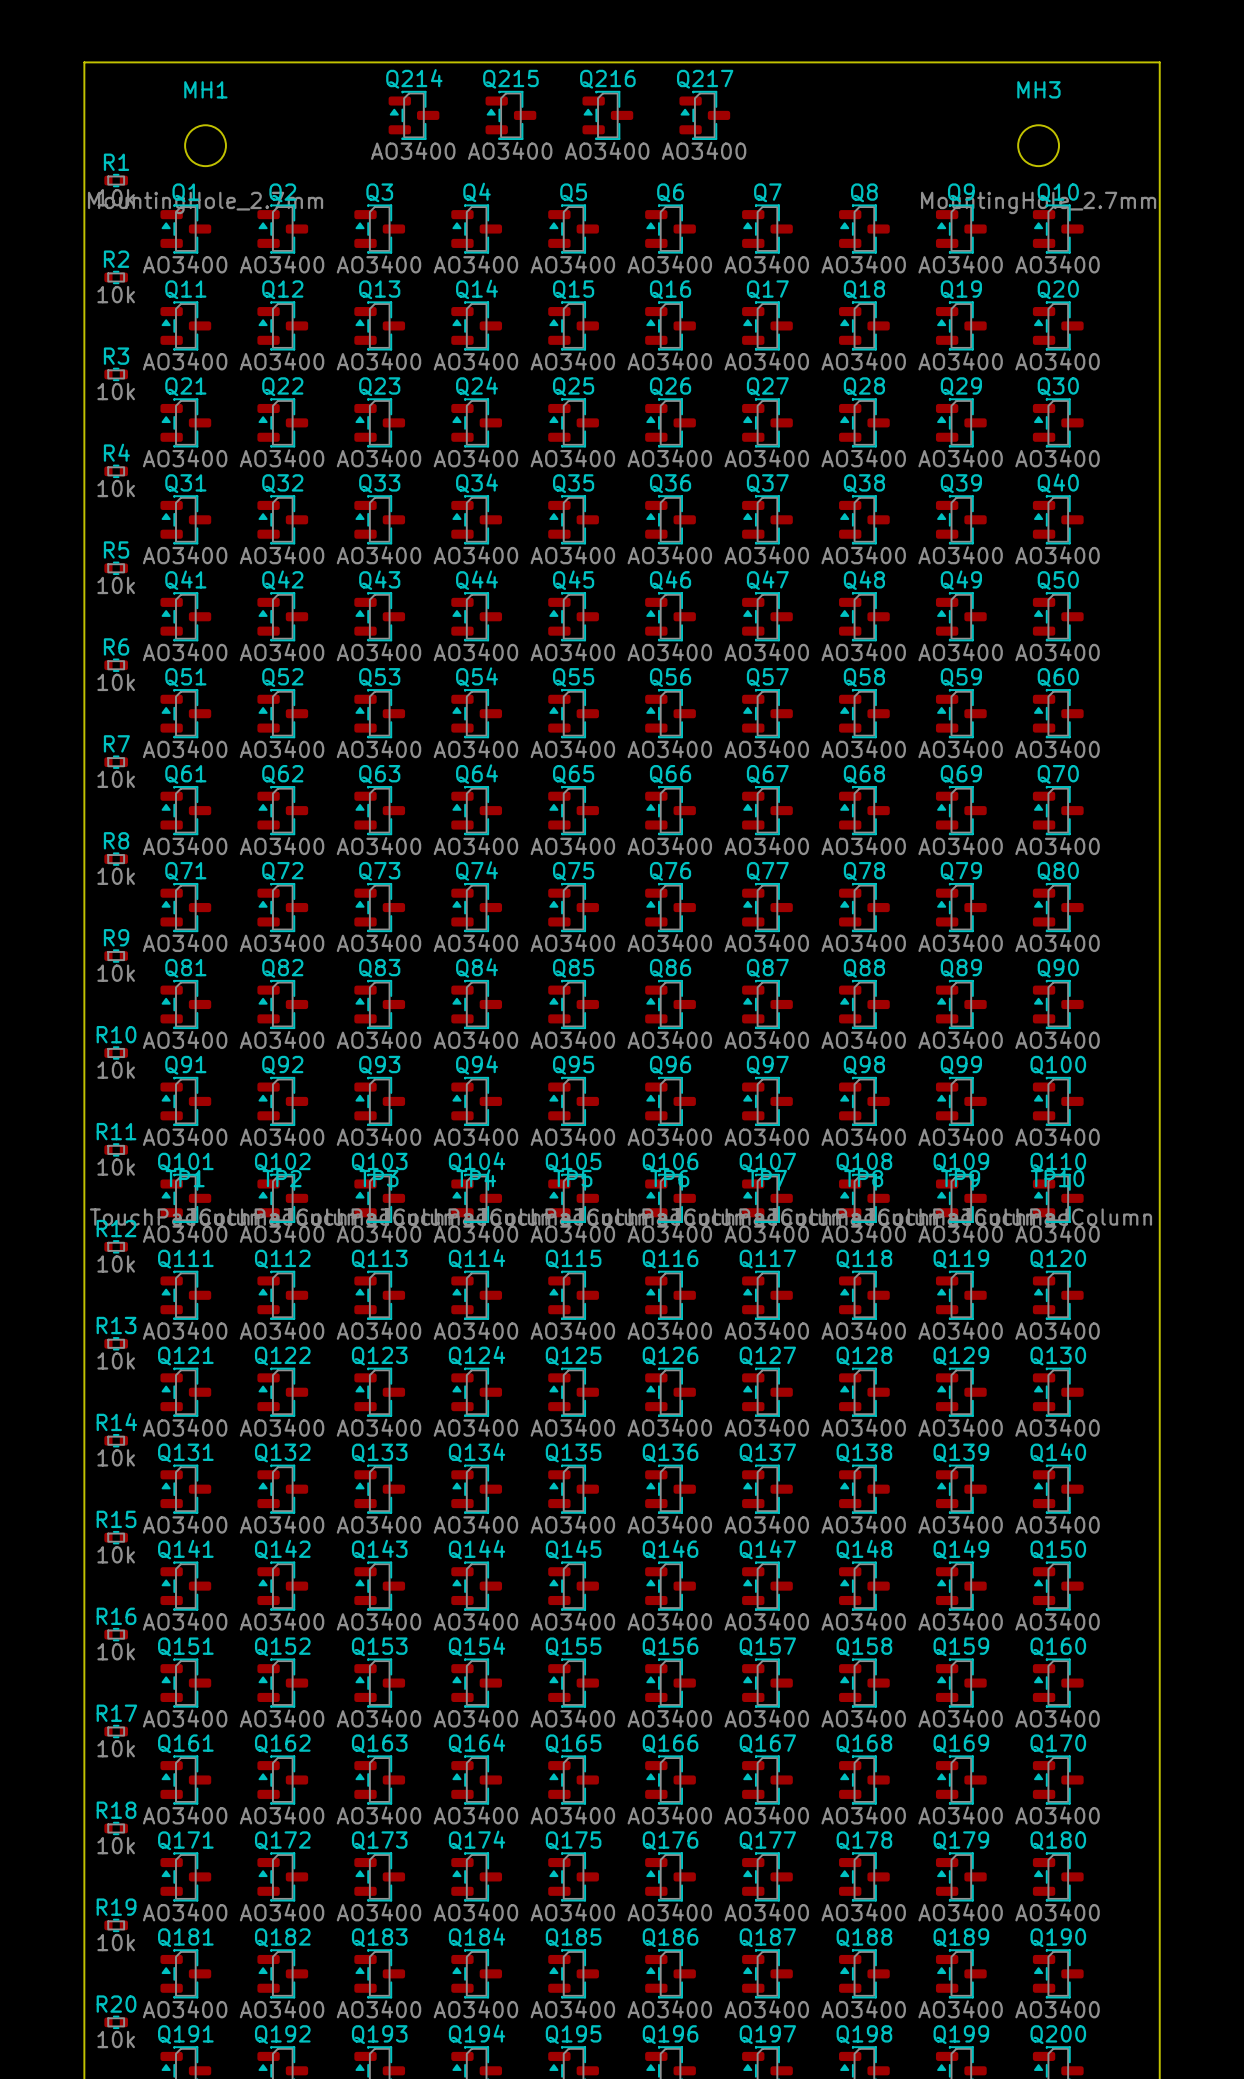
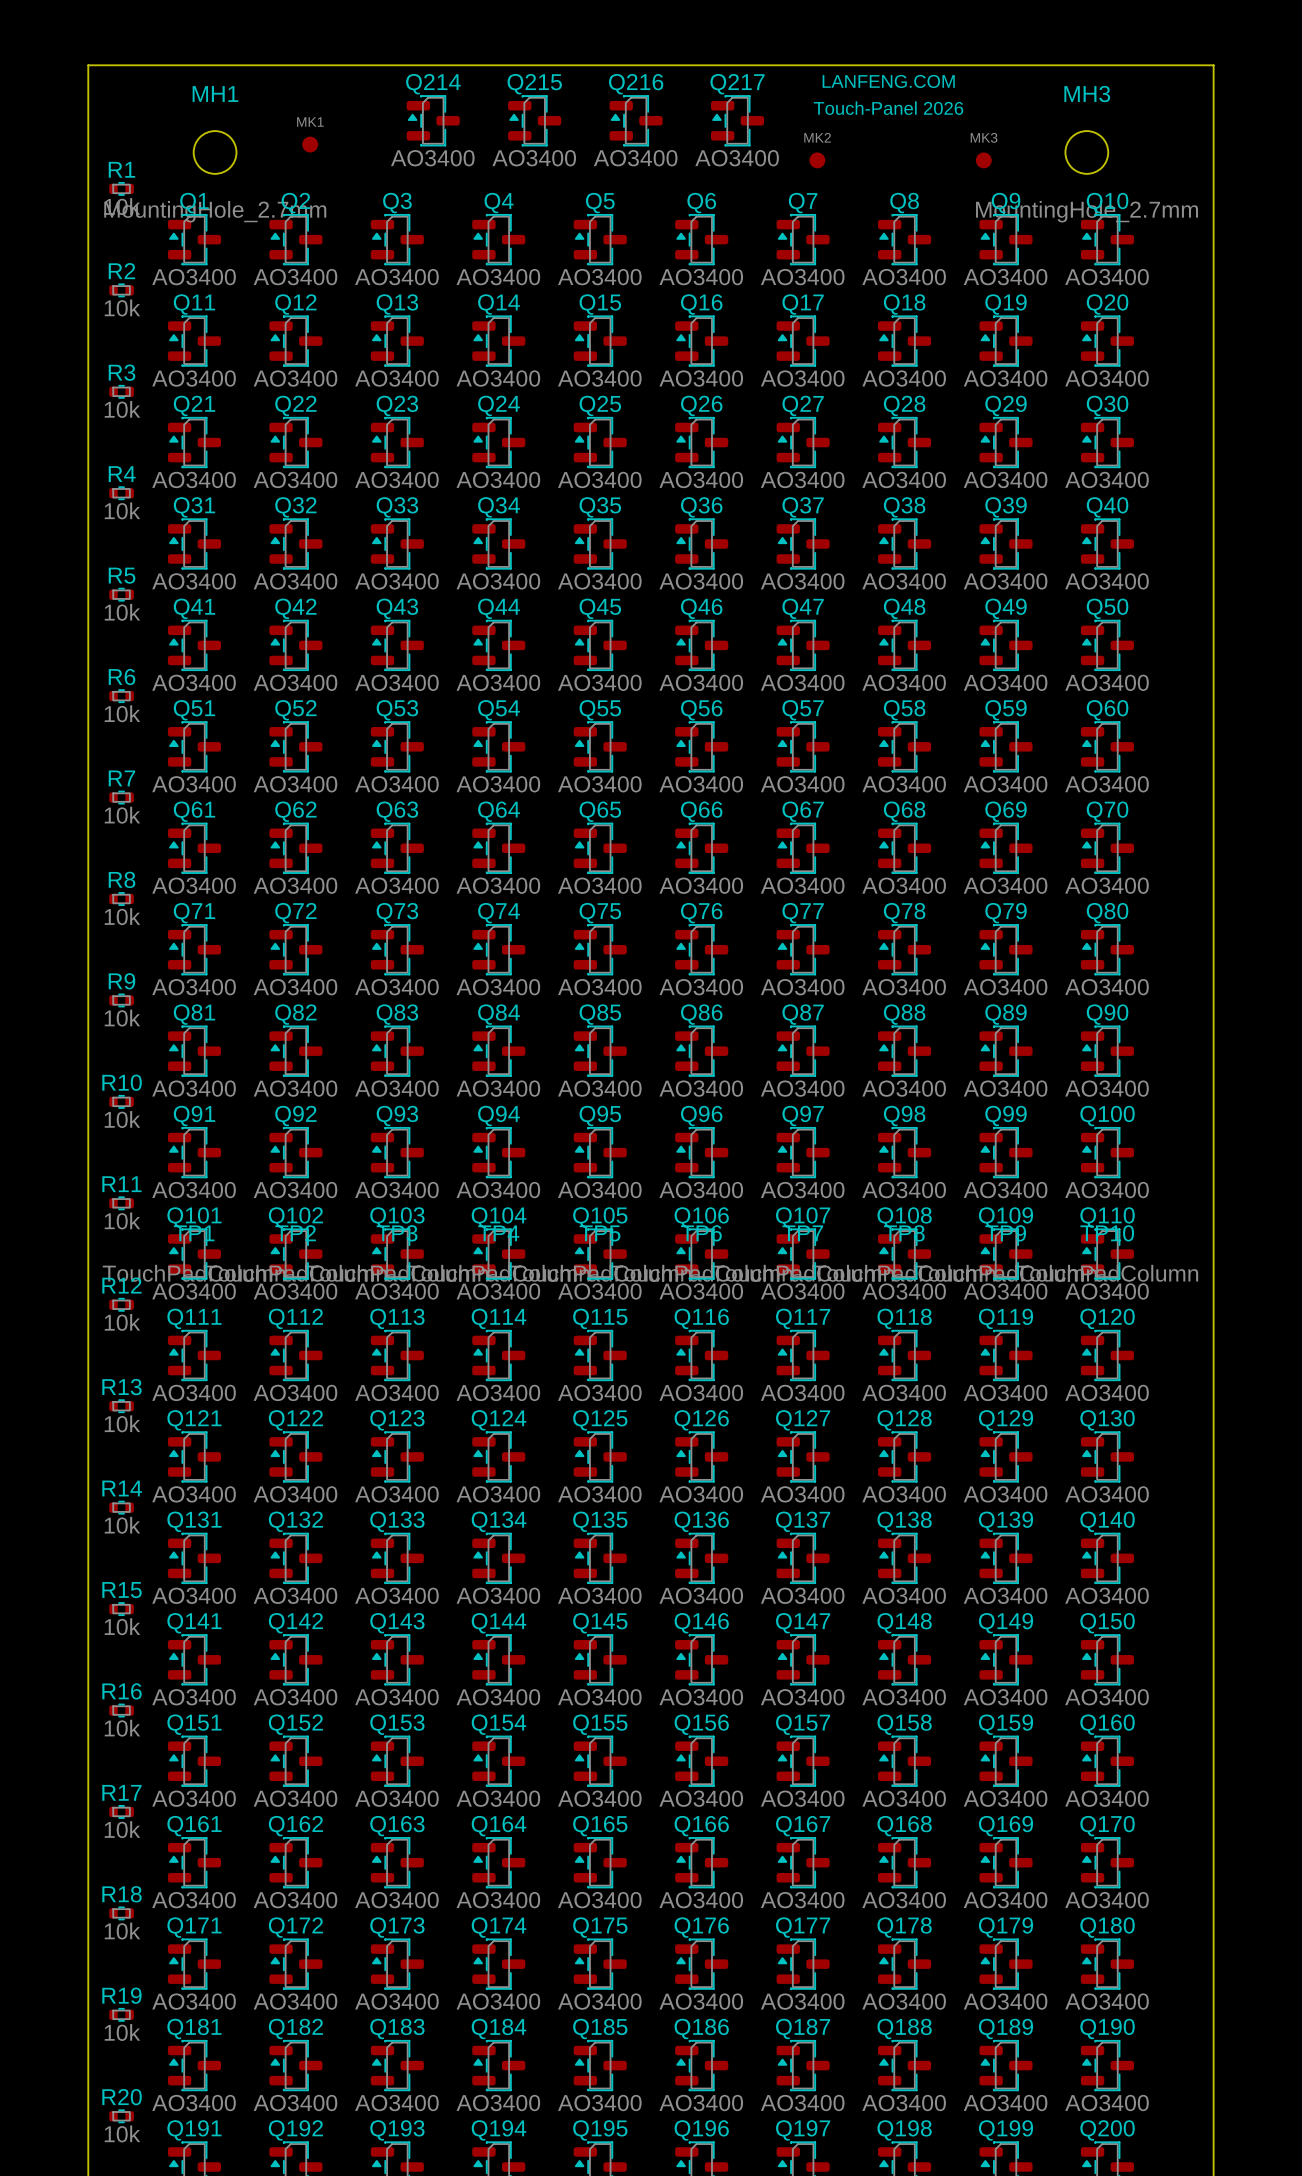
text: none -> LANFENG.COM (888, 81)
text: none -> Touch-Panel 2026 (888, 108)
MK1: none -> (310, 144)
MK2: none -> (817, 160)
MK3: none -> (983, 160)

